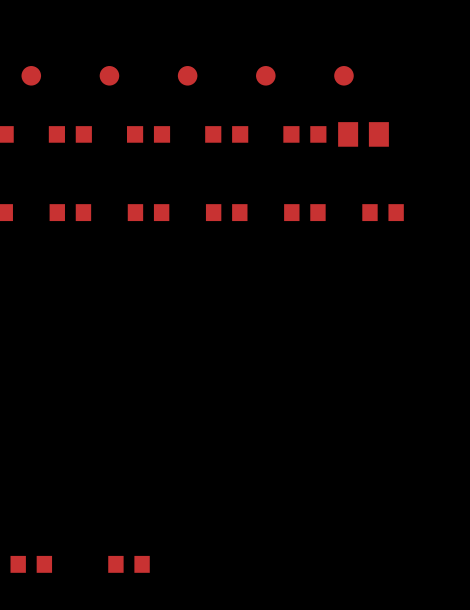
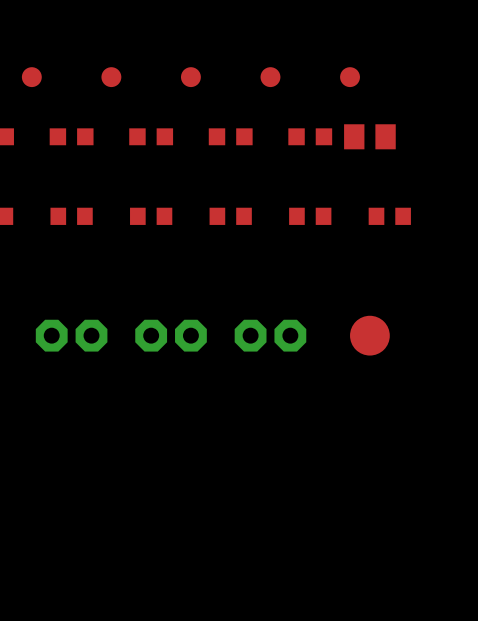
part: none -> (71, 335)
part: none -> (171, 335)
part: none -> (270, 335)
part: none -> (369, 335)
part: (31, 564) -> none
part: (129, 564) -> none

